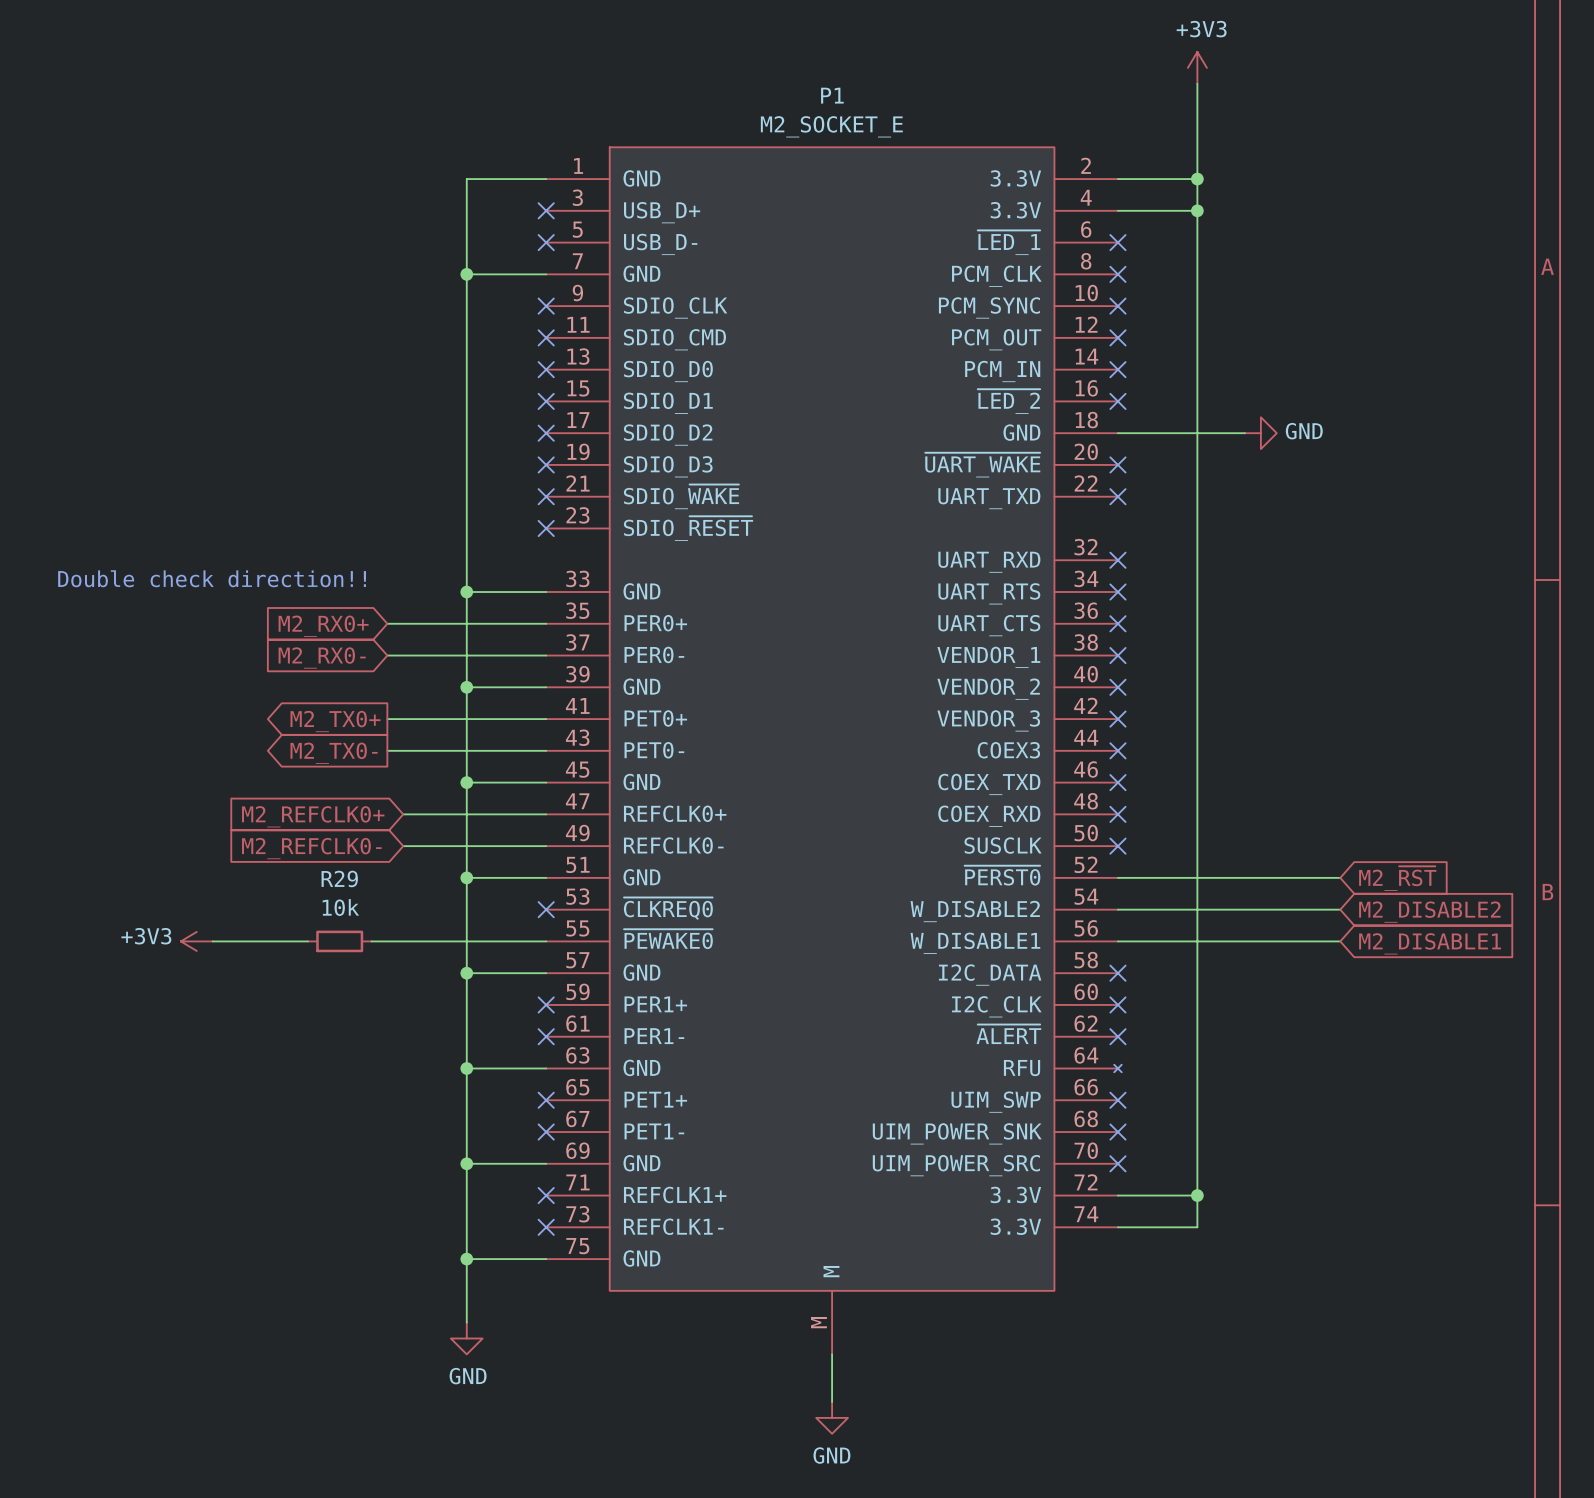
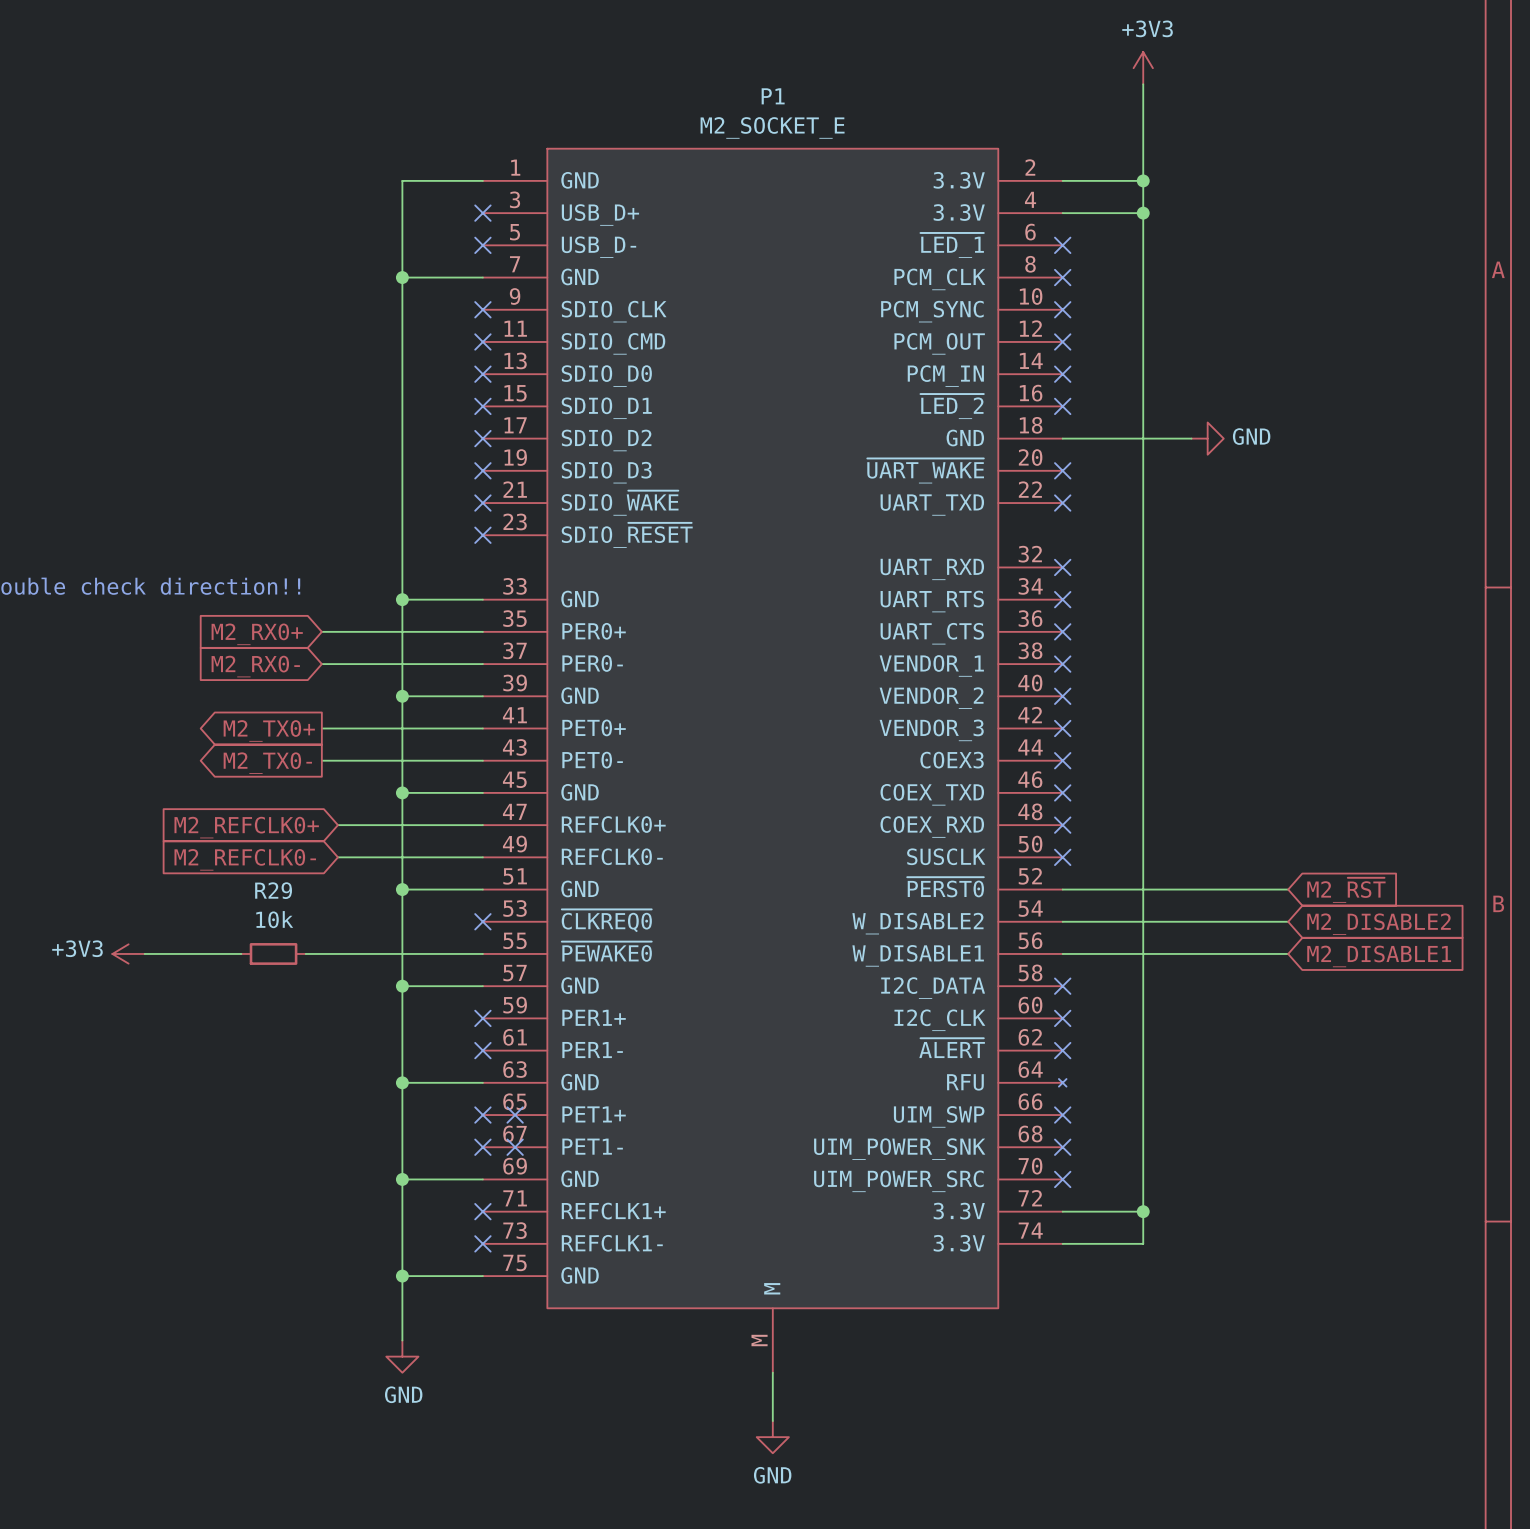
no-connect mark: none -> (515, 1115)
no-connect mark: none -> (515, 1147)

